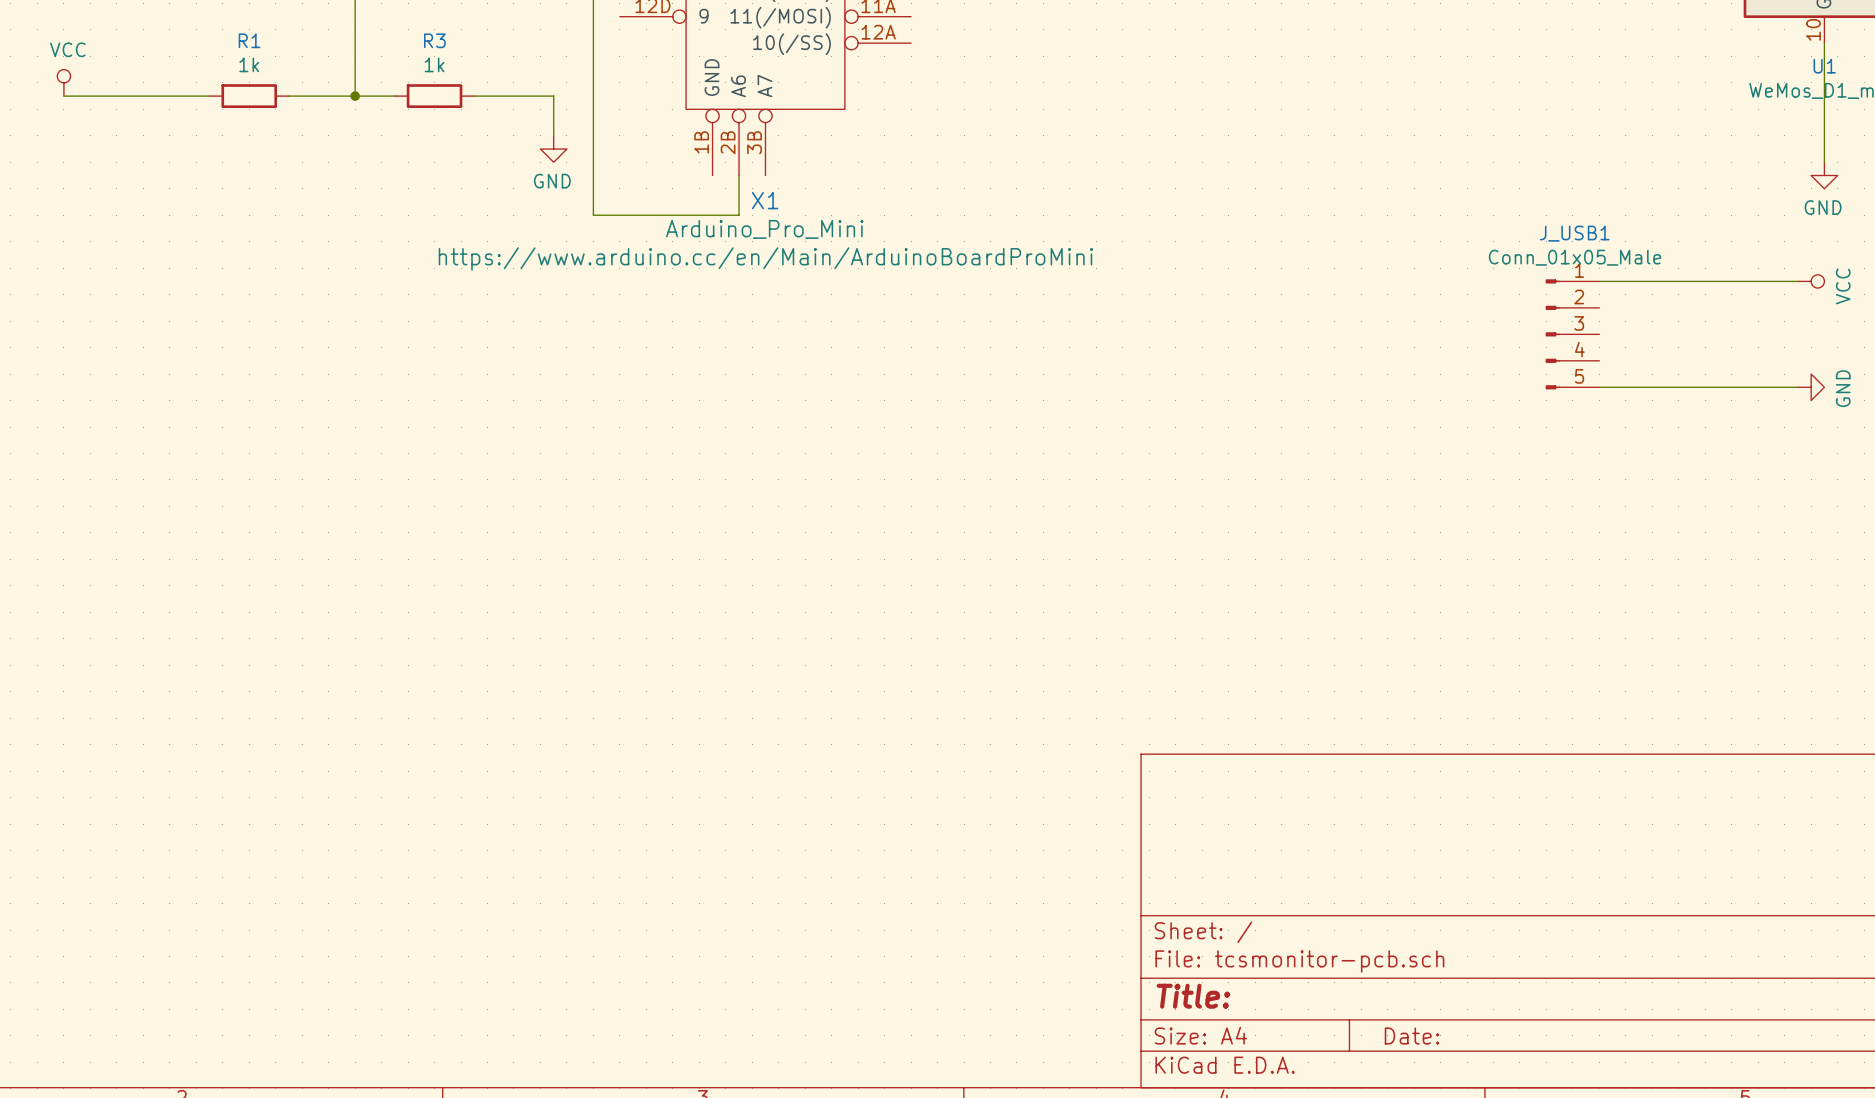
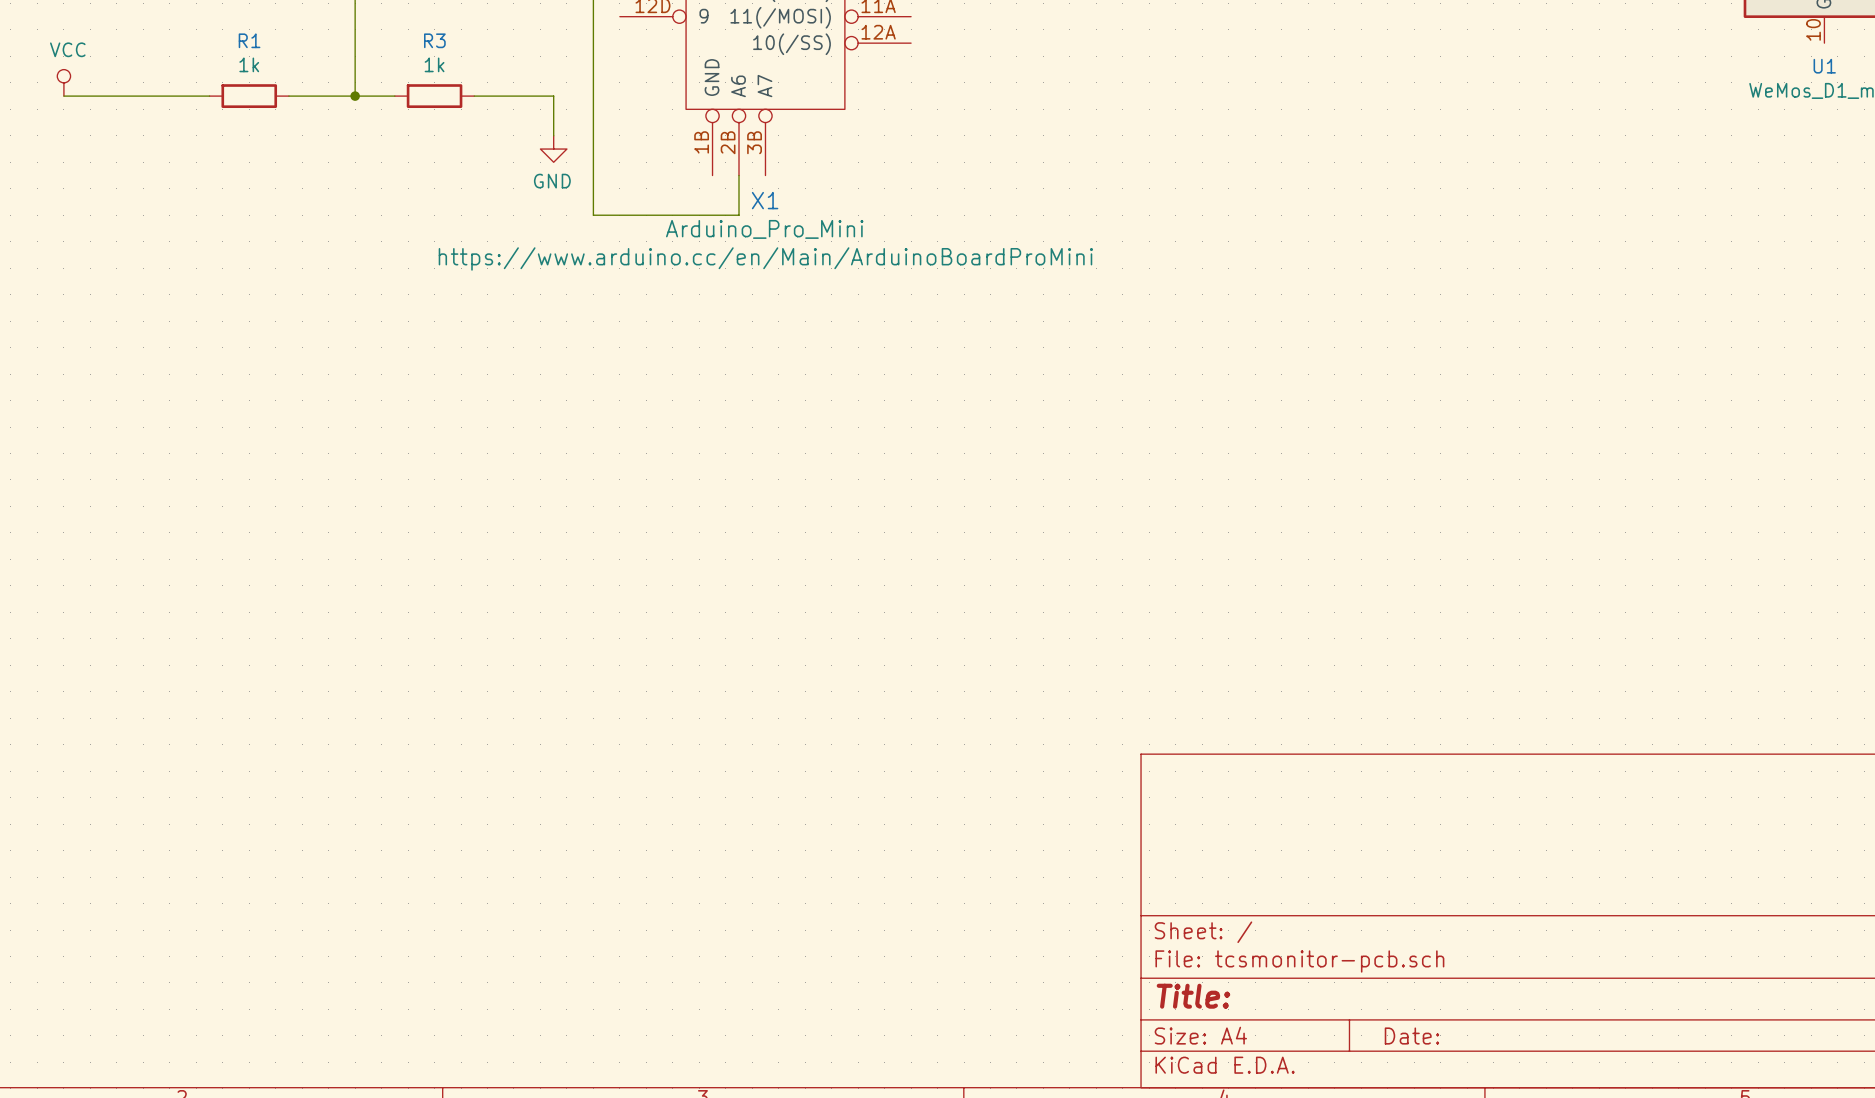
wire: (1824, 43) (1824, 162) -> none
power symbol: GND (1824, 175) -> none
wire: (1599, 281) (1797, 281) -> none
power symbol: VCC (1811, 281) -> none
J_USB1: Conn_01x05_Male (1572, 334) -> none
wire: (1599, 387) (1797, 387) -> none
power symbol: GND (1811, 387) -> none

